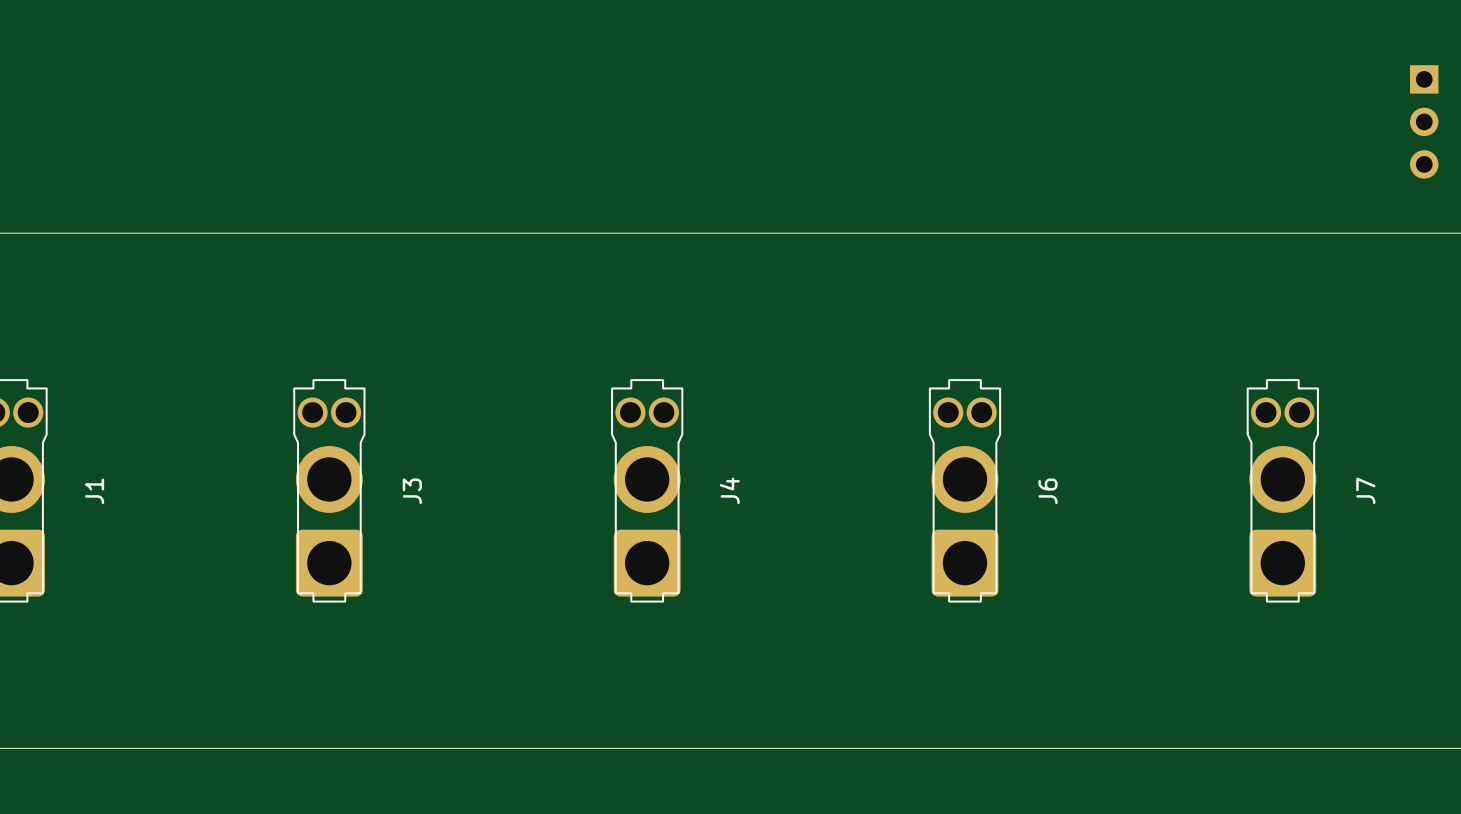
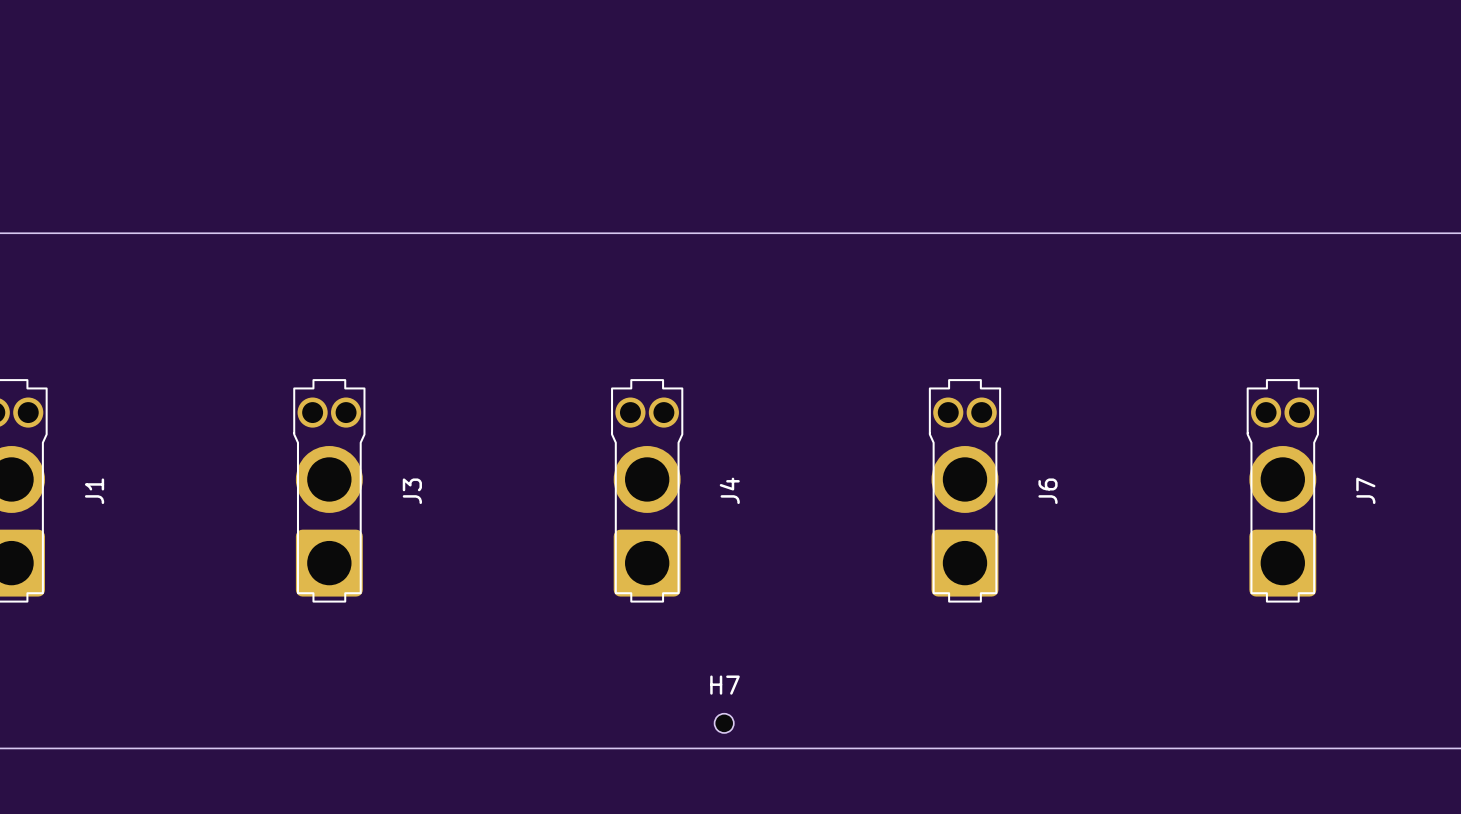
part: (1424, 121) -> none
H7: none -> (724, 723)

